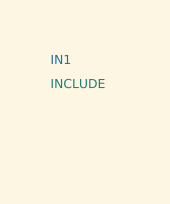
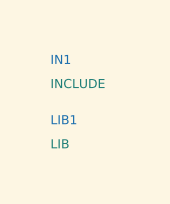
LIB1: none -> LIB (63, 131)

